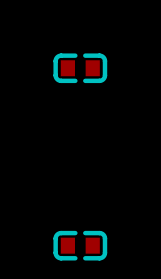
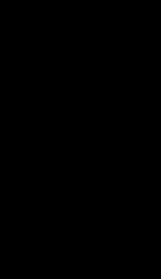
part: (80, 68) -> none
part: (80, 245) -> none

